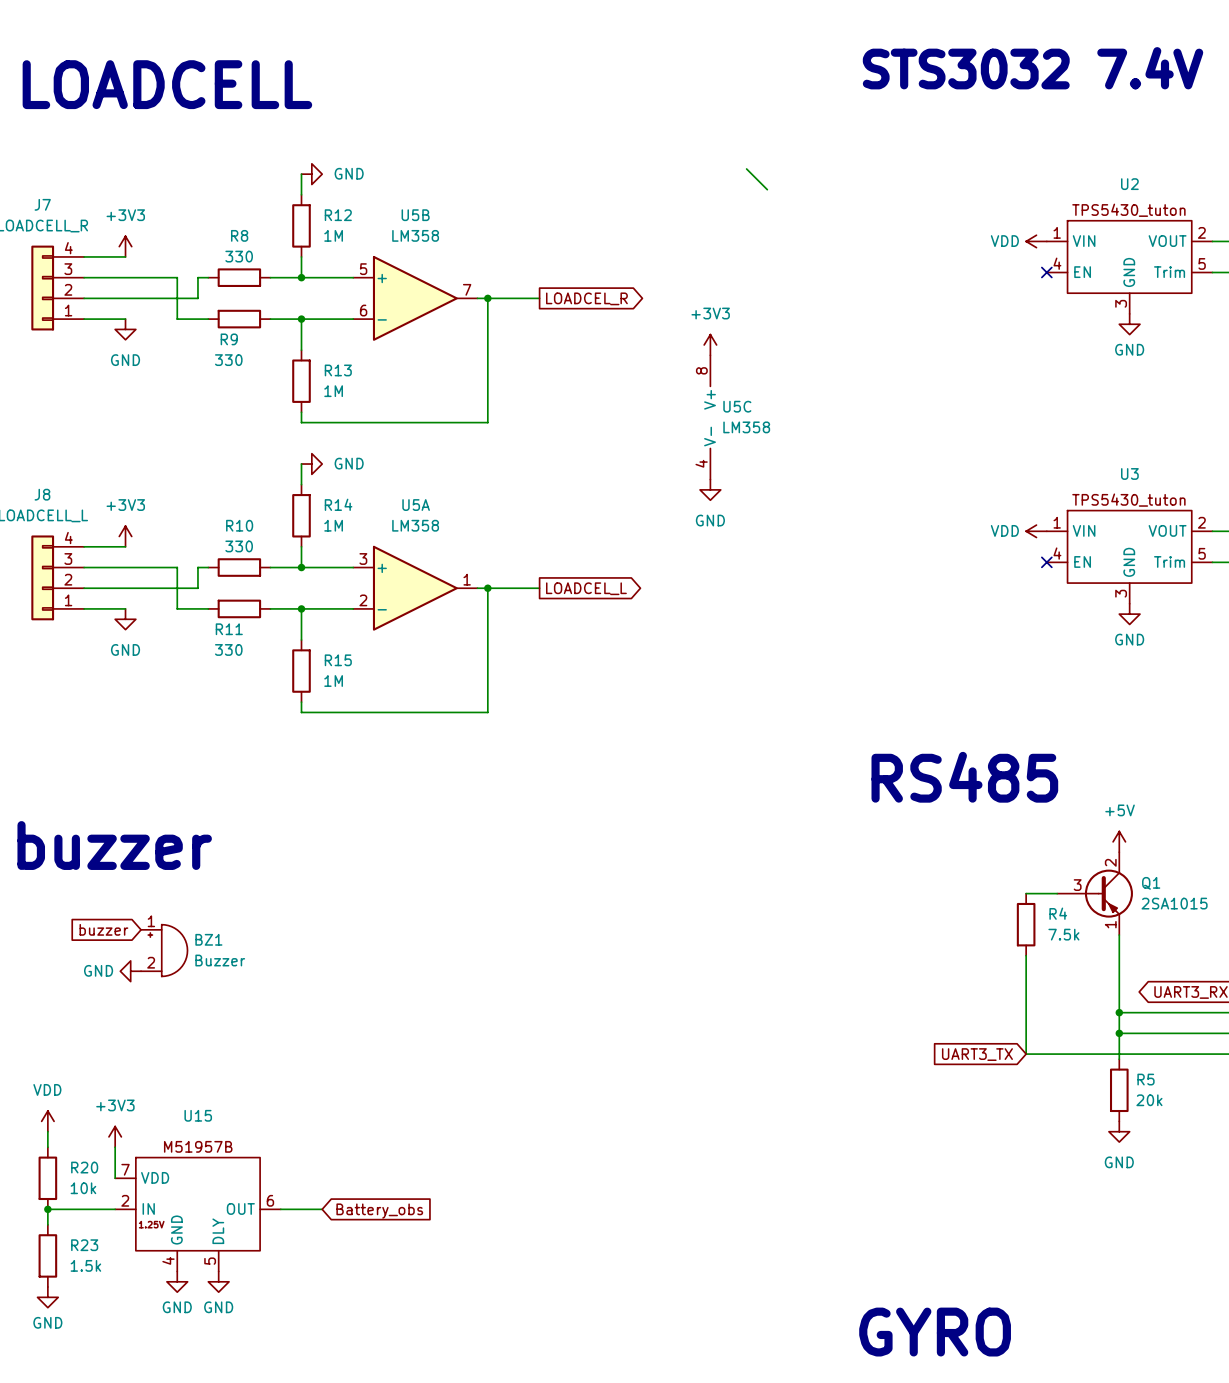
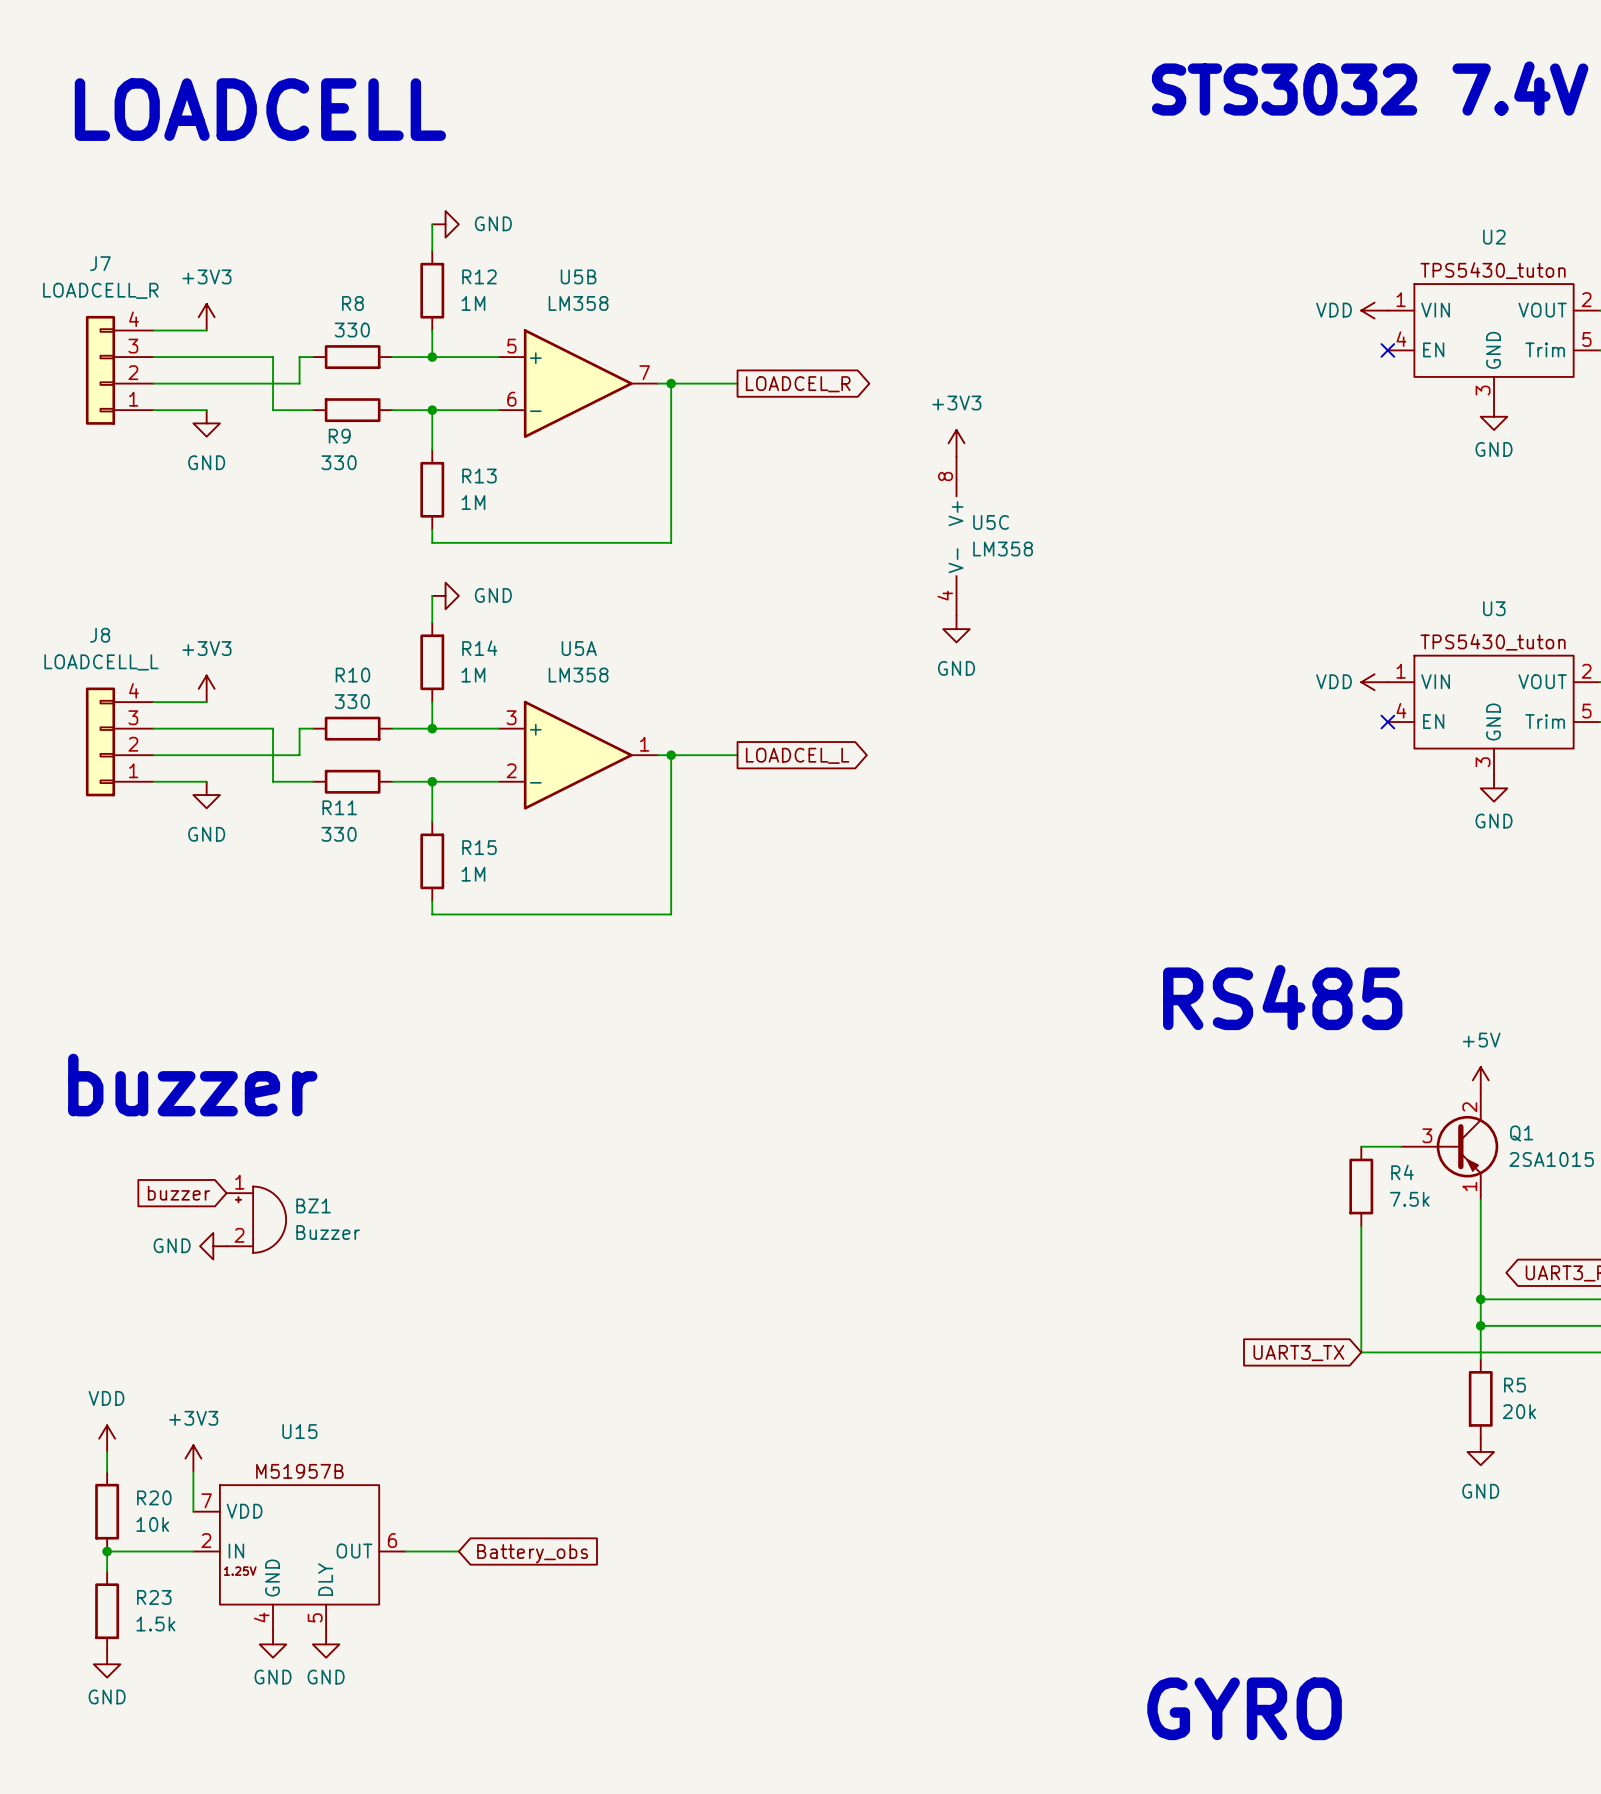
wire: (746, 168) (767, 189) -> none

